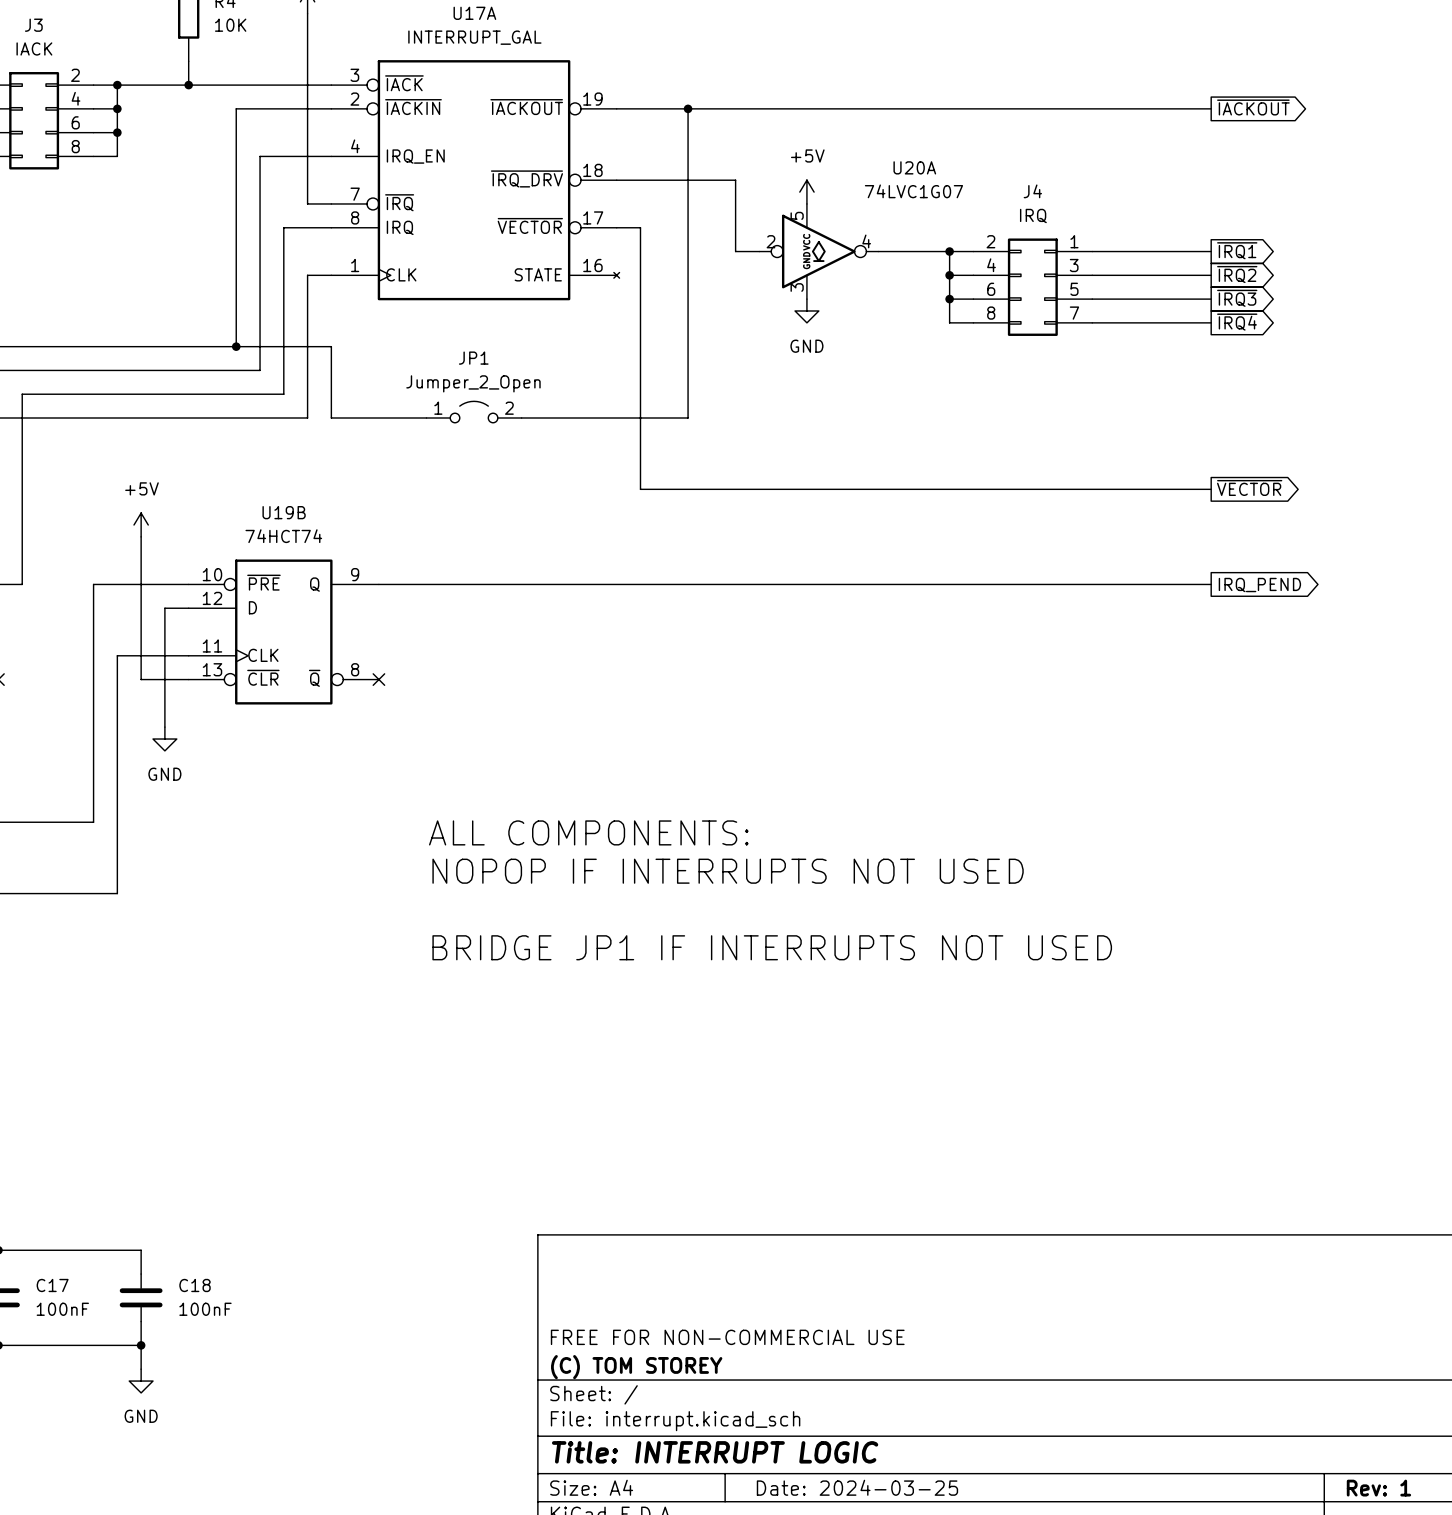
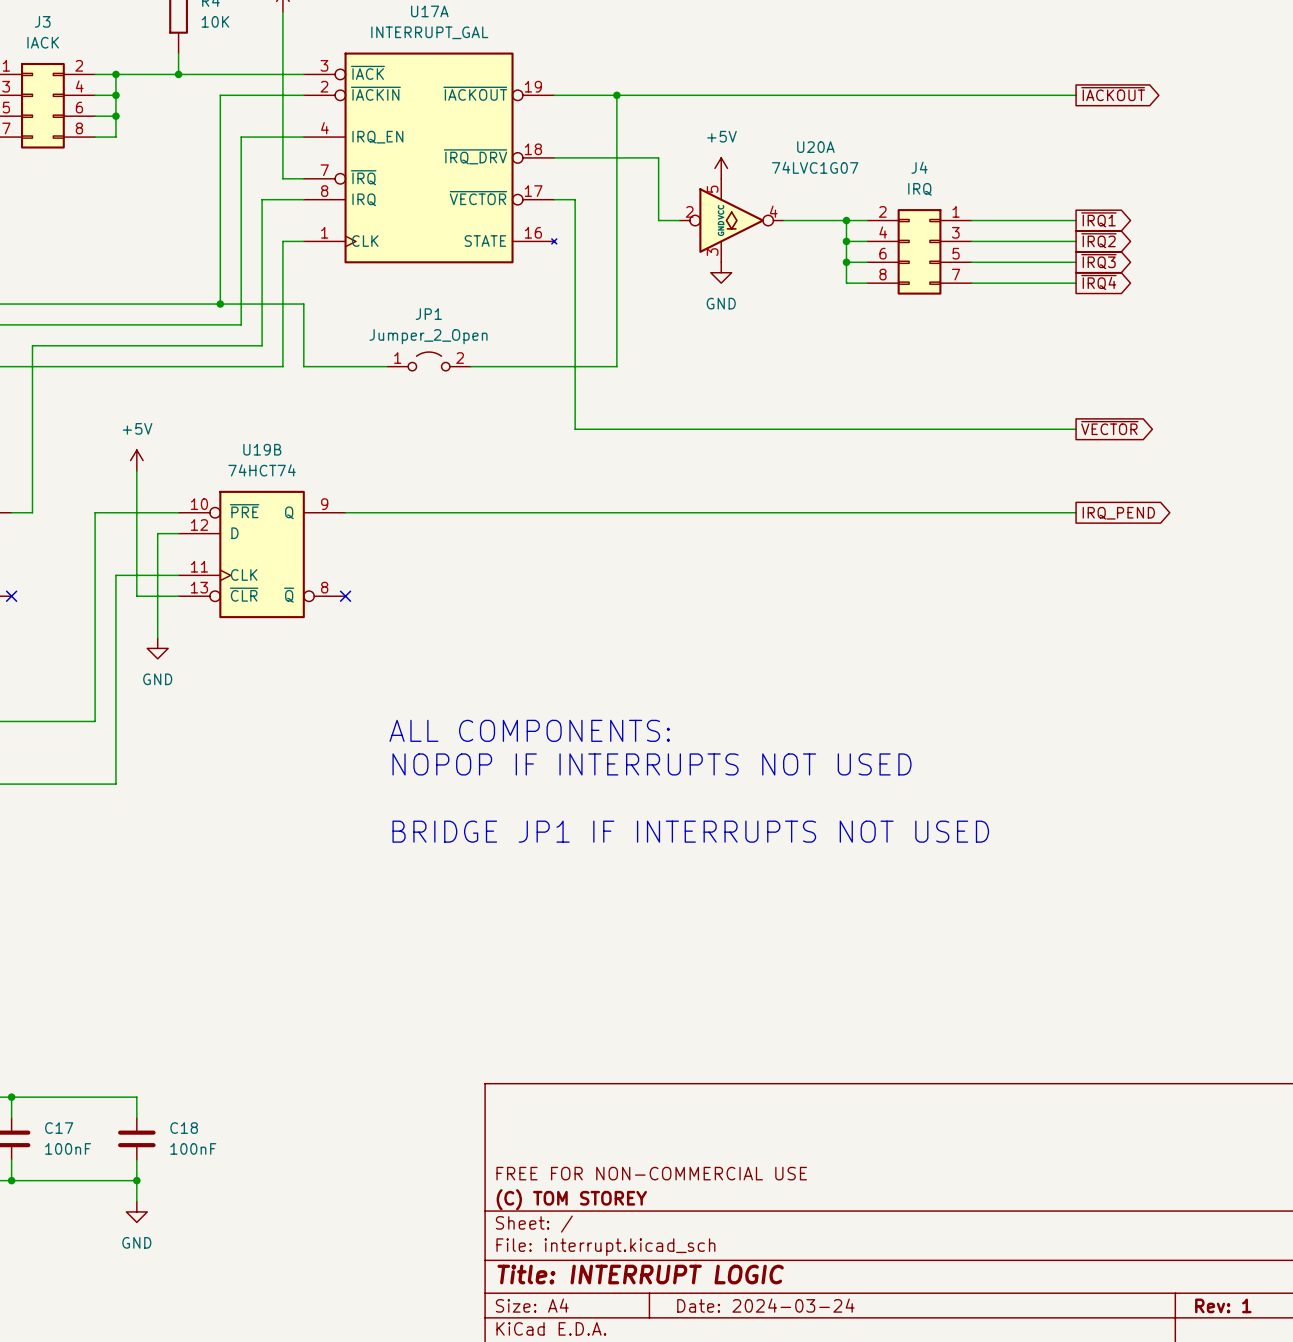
title block: Date: 2024-03-25 (857, 1487) -> Date: 2024-03-24 (765, 1305)

